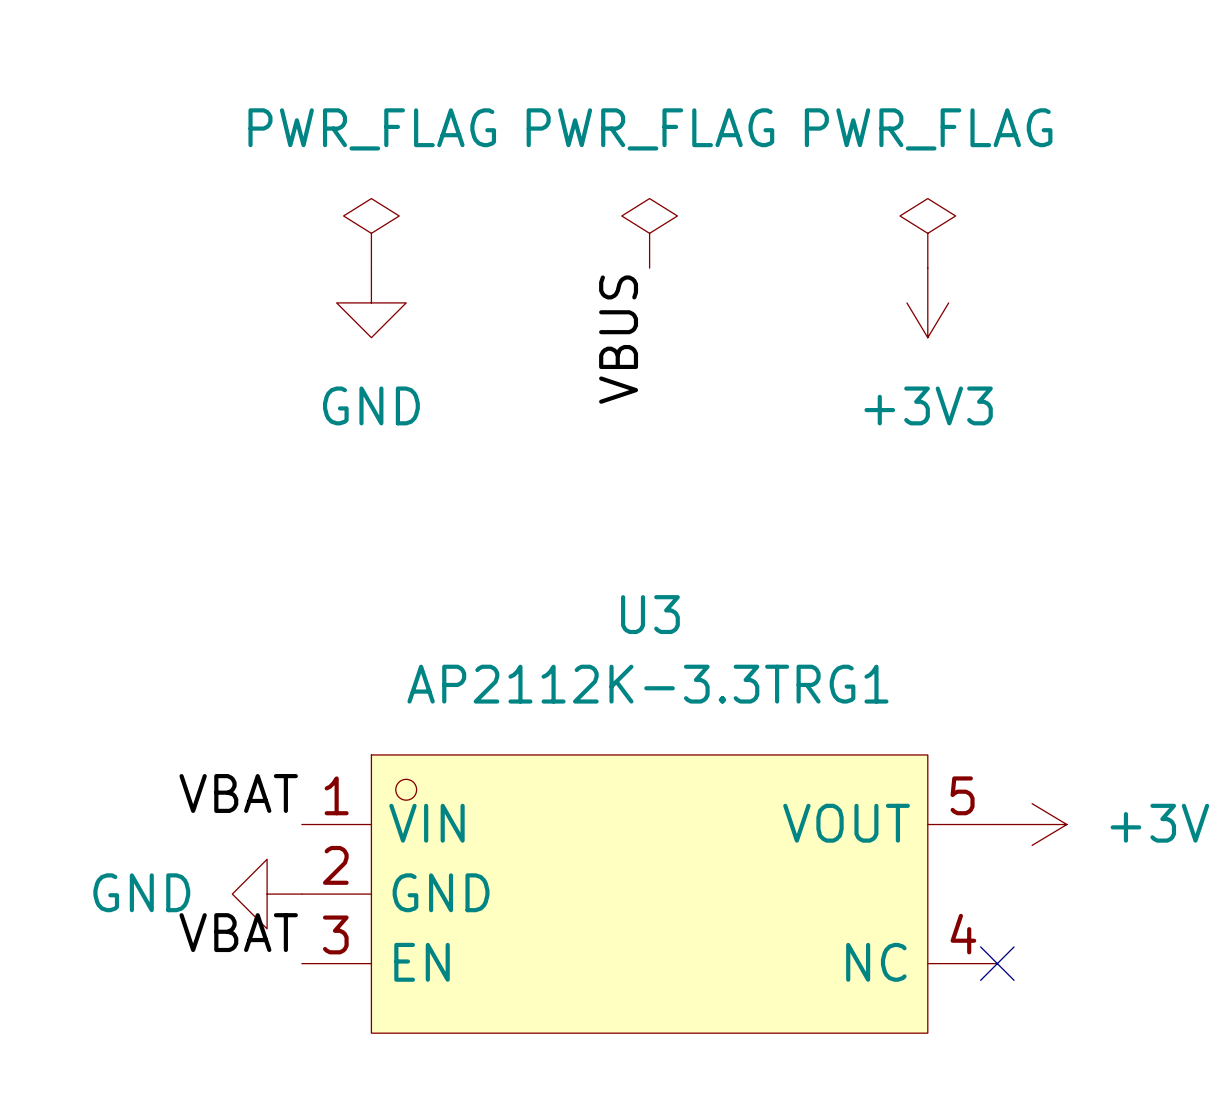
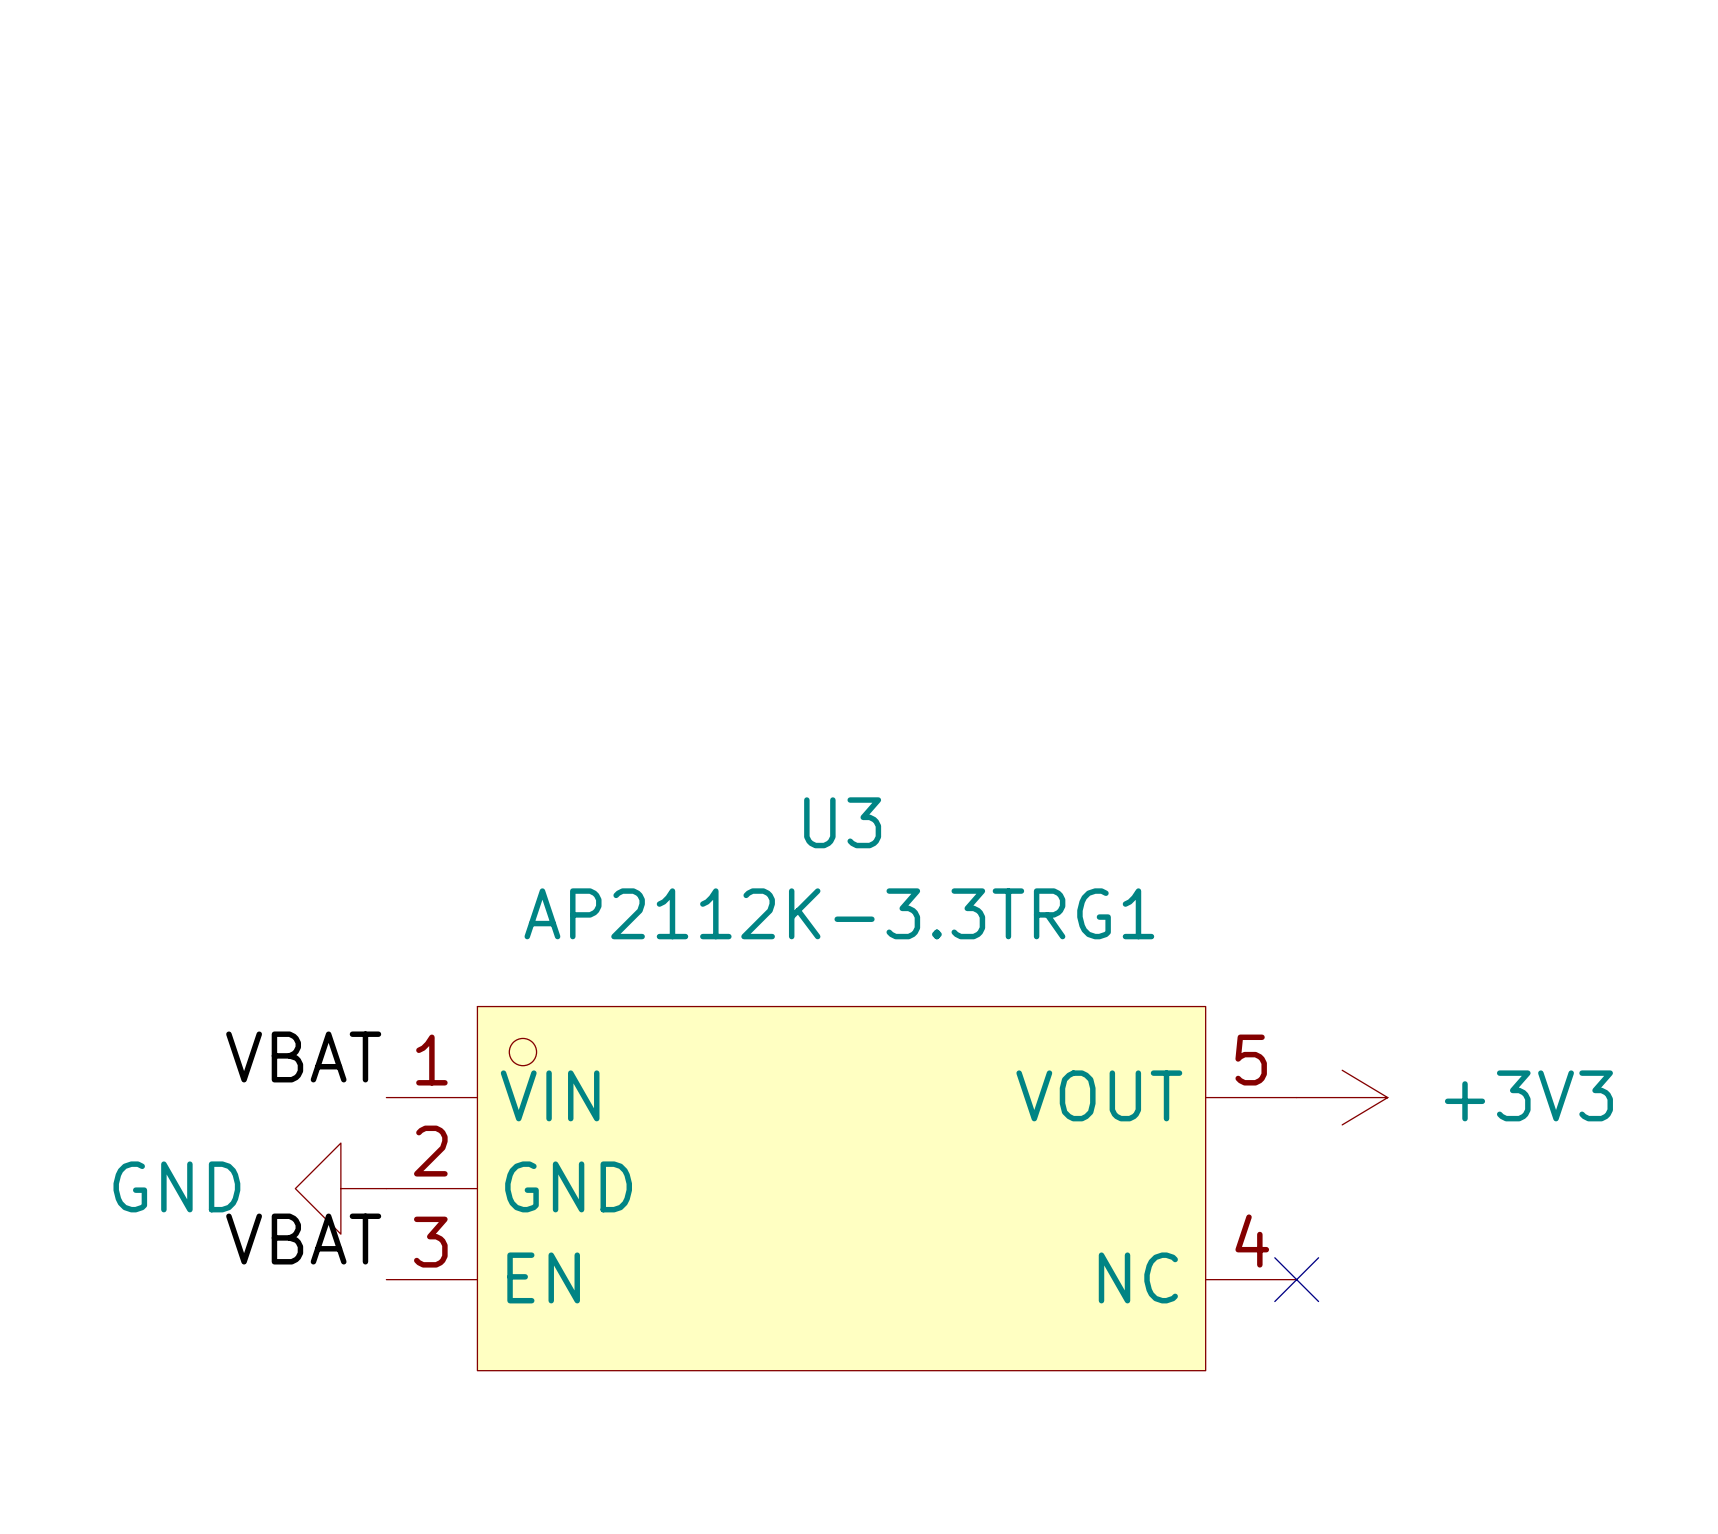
power symbol: PWR_FLAG (371, 233) -> none
power symbol: PWR_FLAG (649, 233) -> none
power symbol: PWR_FLAG (927, 233) -> none
power symbol: GND (371, 302) -> none
power symbol: +3V3 (927, 302) -> none
label: VBUS (618, 339) -> none

